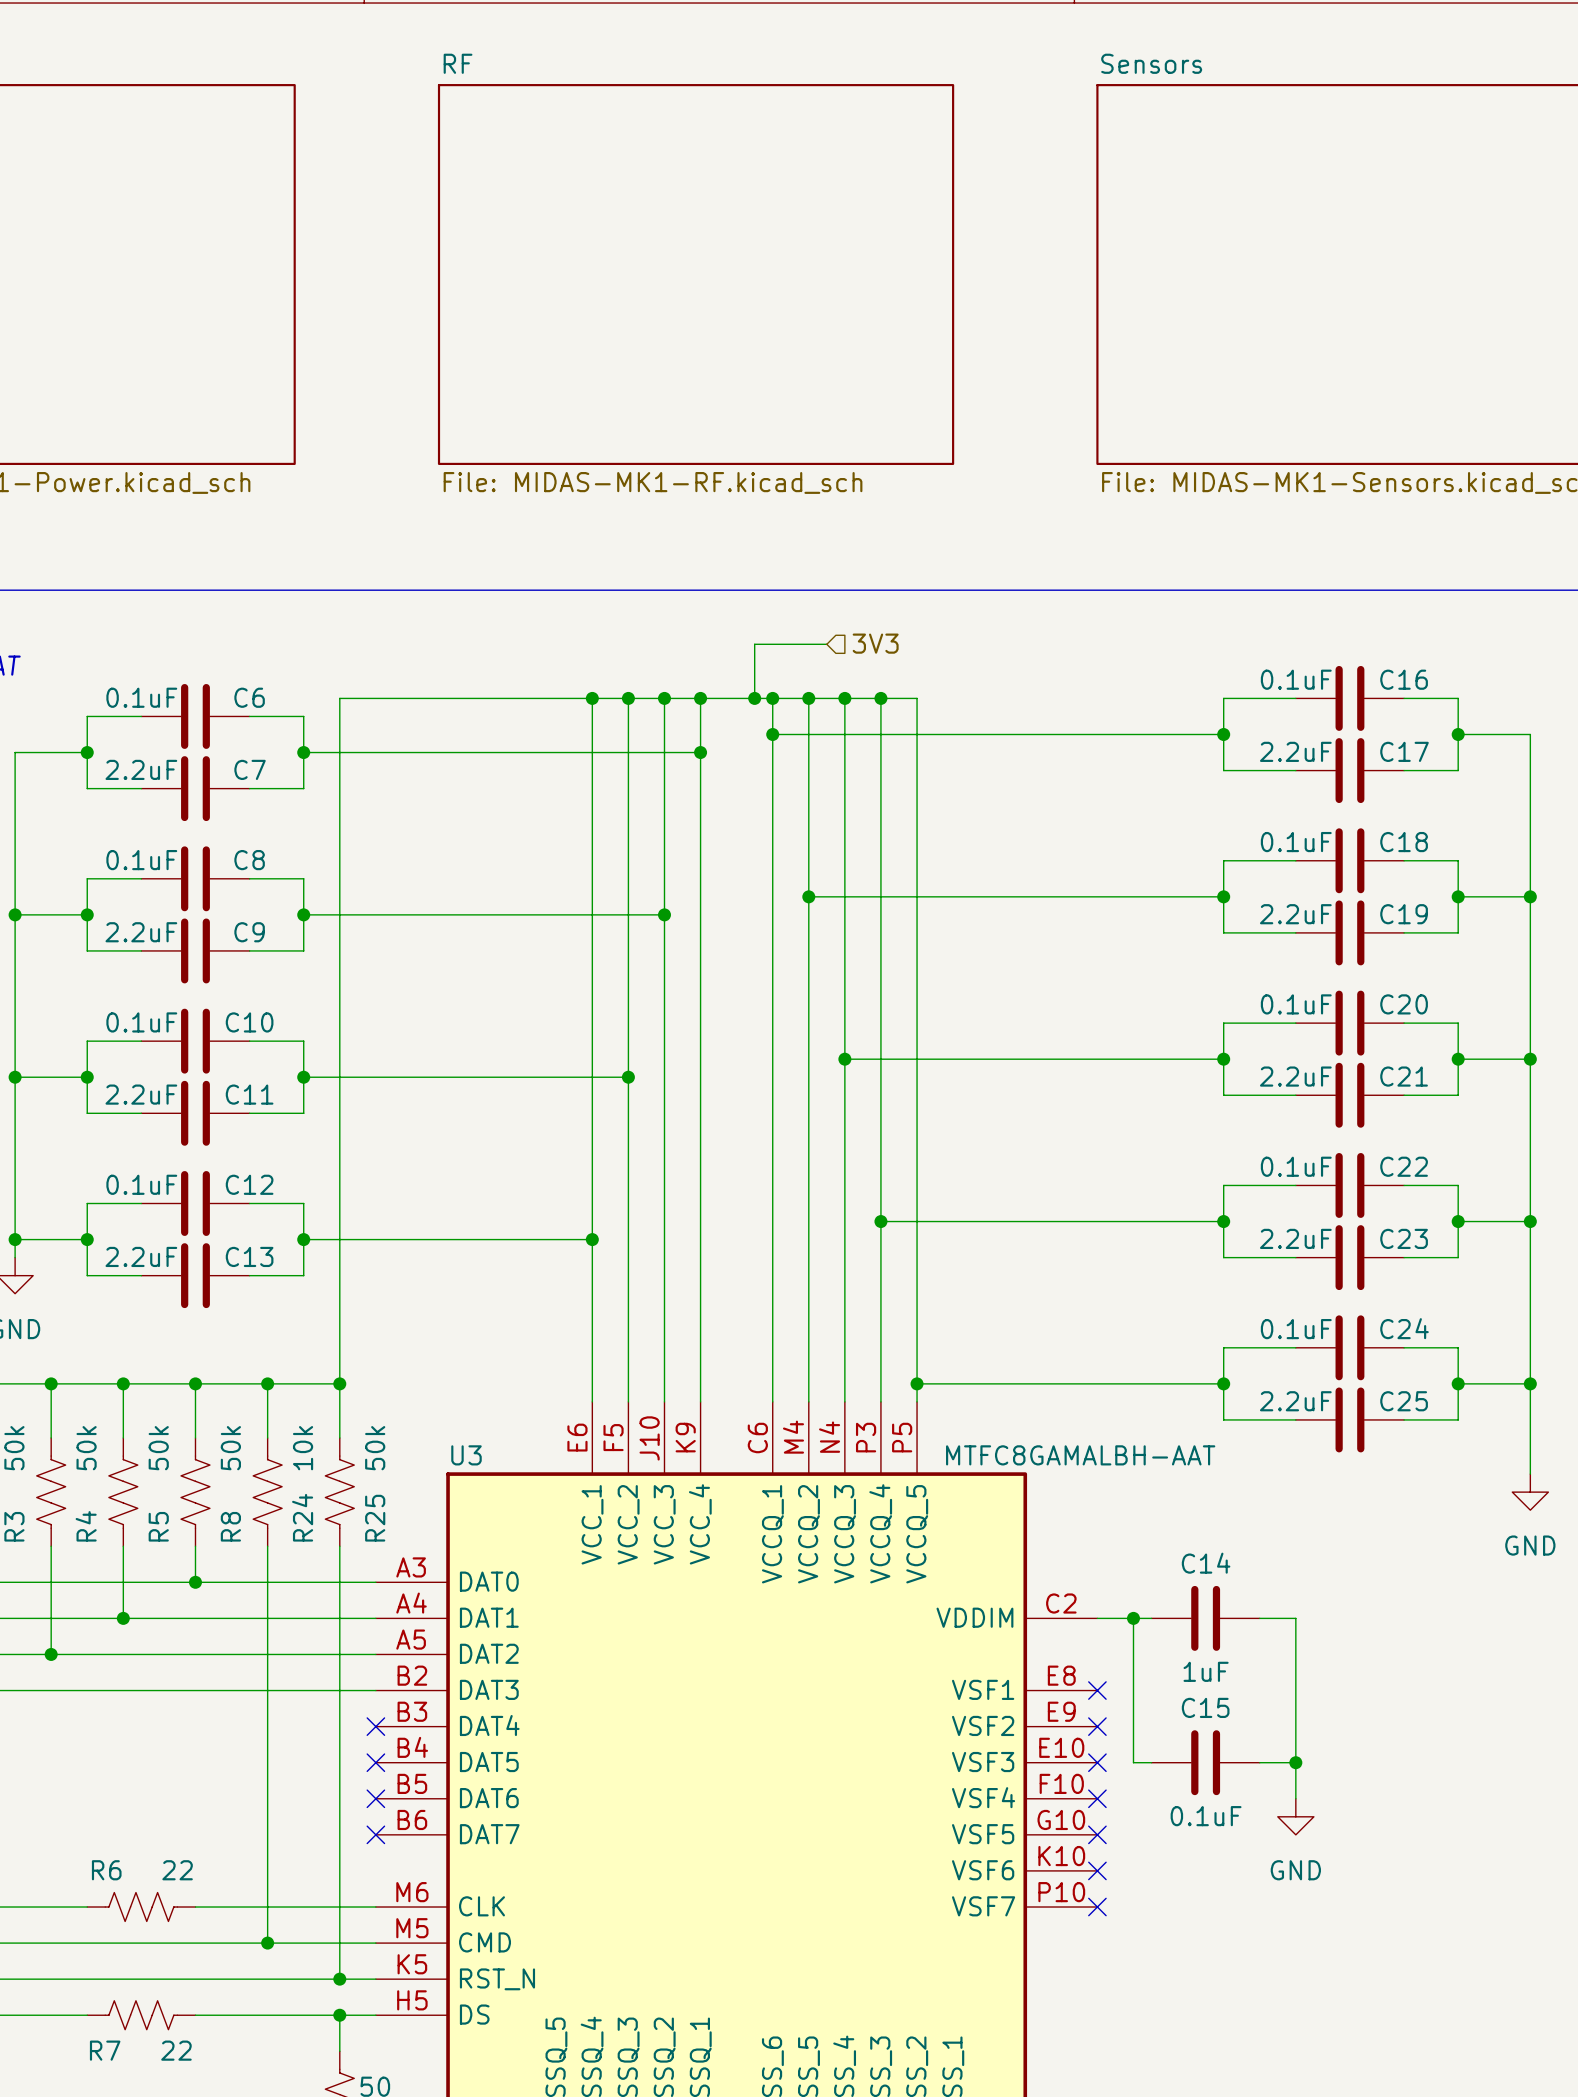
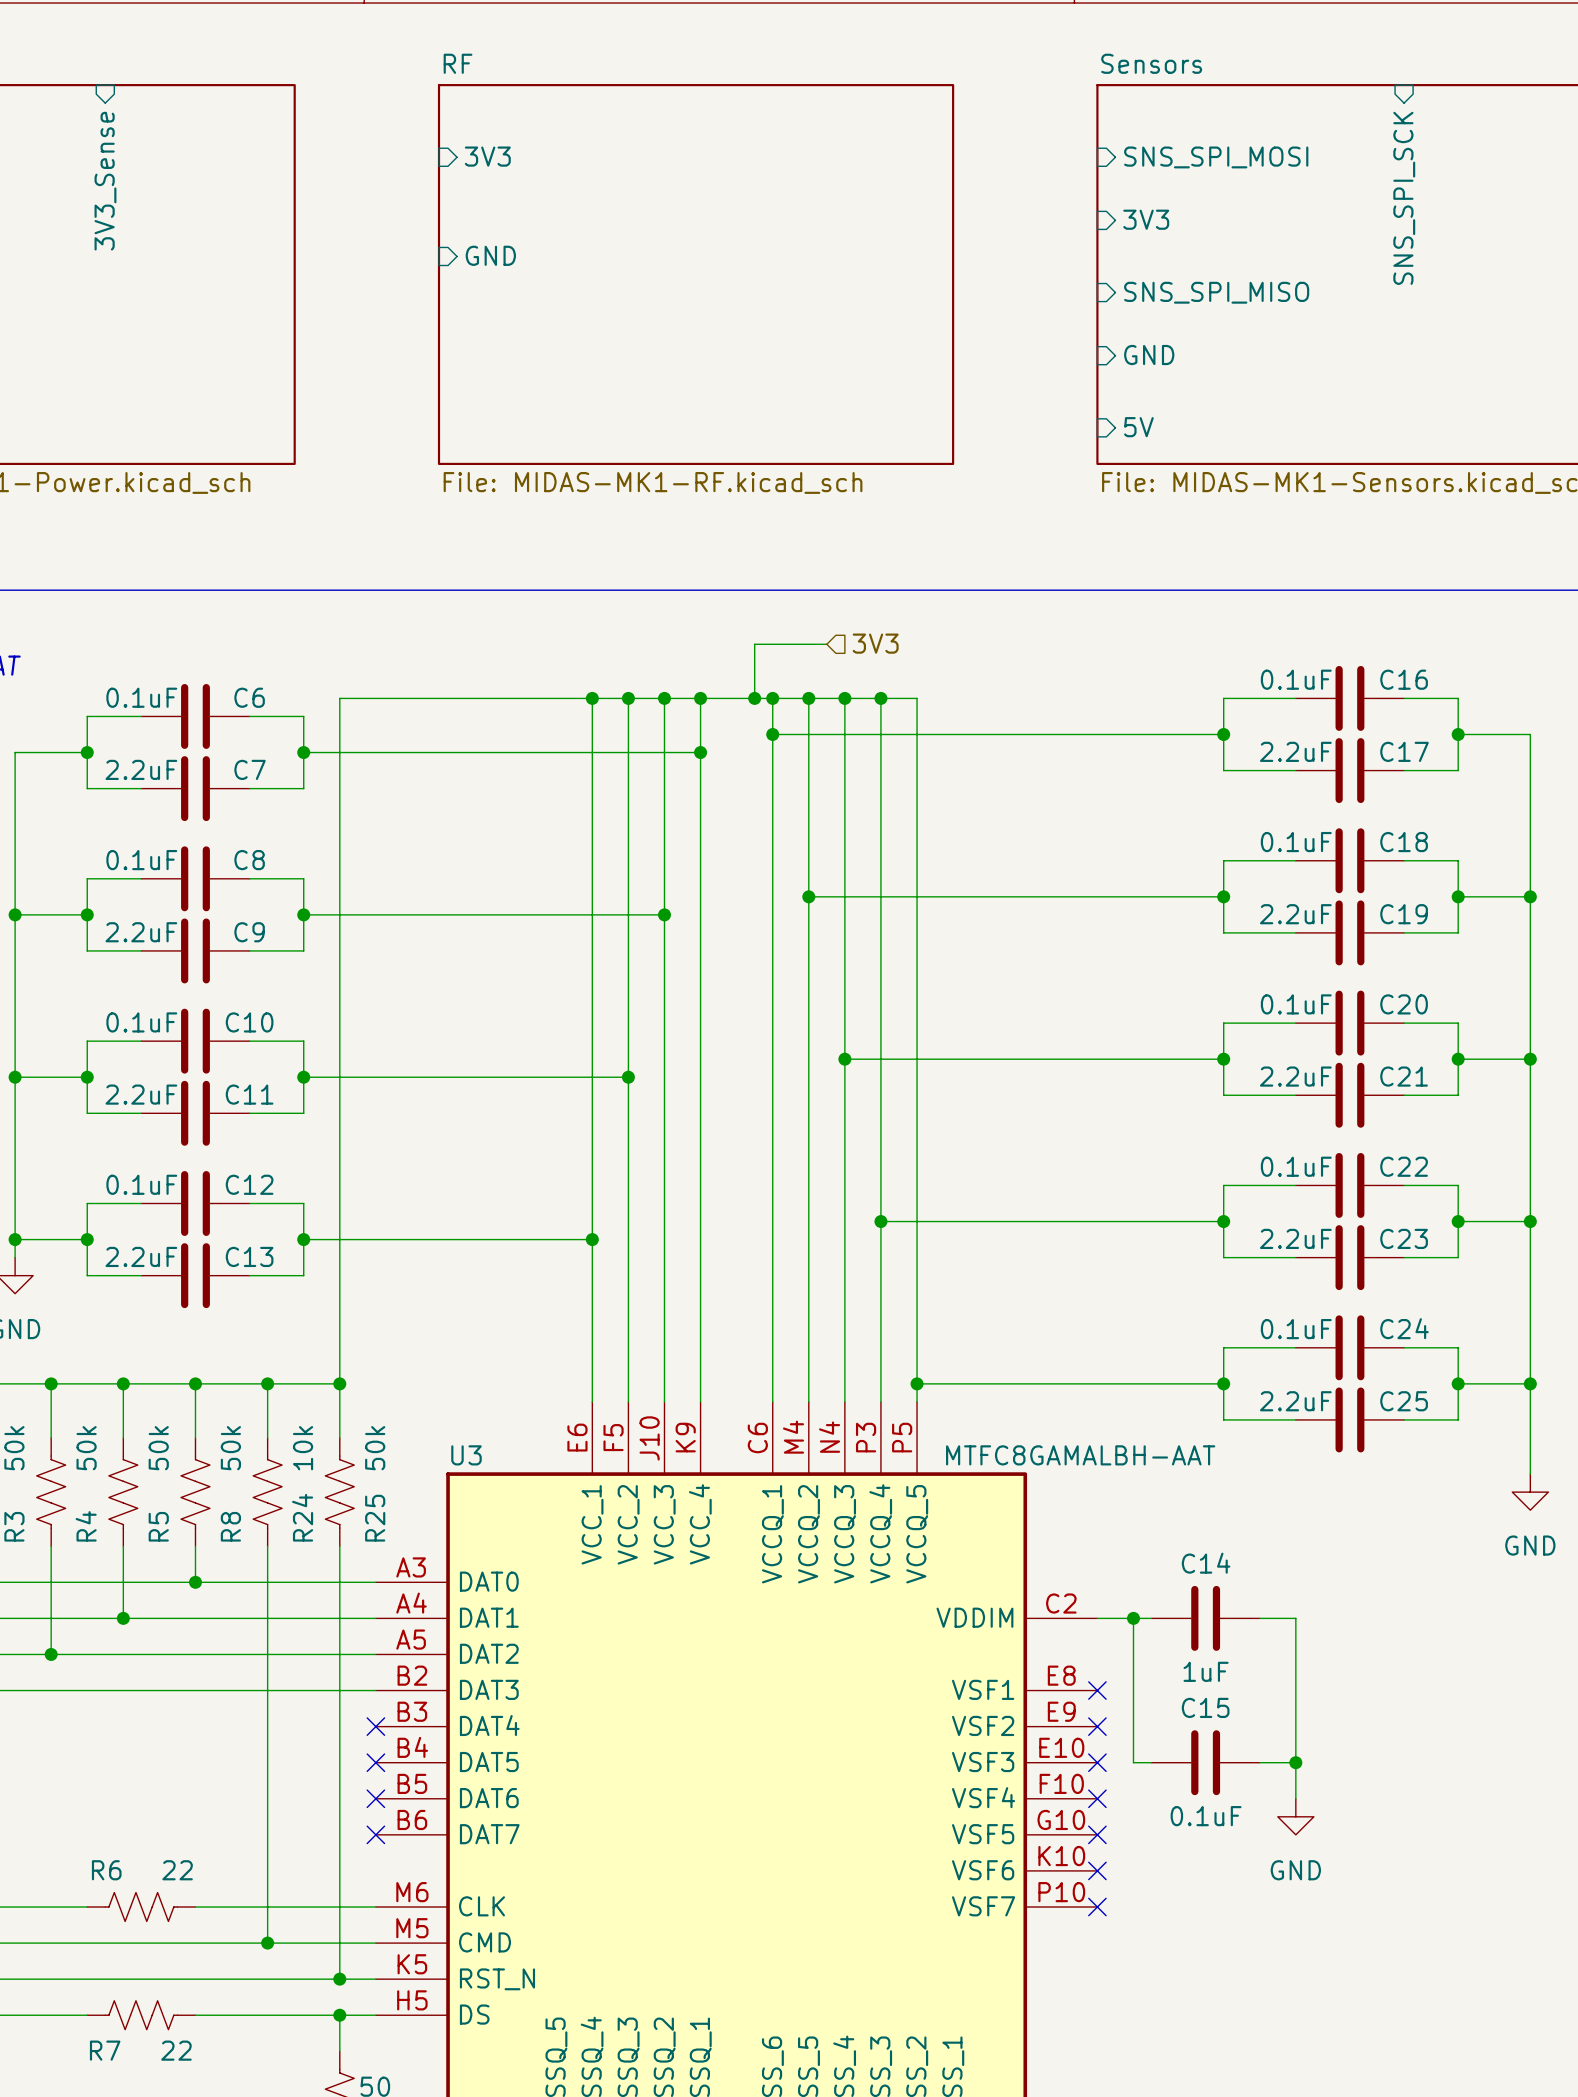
sheet pin: none -> 3V3 (487, 156)
sheet pin: none -> SNS_SPI_MOSI (1216, 157)
sheet pin: none -> 3V3_Sense (105, 181)
sheet pin: none -> SNS_SPI_SCK (1404, 198)
sheet pin: none -> 3V3 (1146, 219)
sheet pin: none -> GND (490, 255)
sheet pin: none -> SNS_SPI_MISO (1216, 292)
sheet pin: none -> GND (1149, 355)
sheet pin: none -> 5V (1138, 427)

